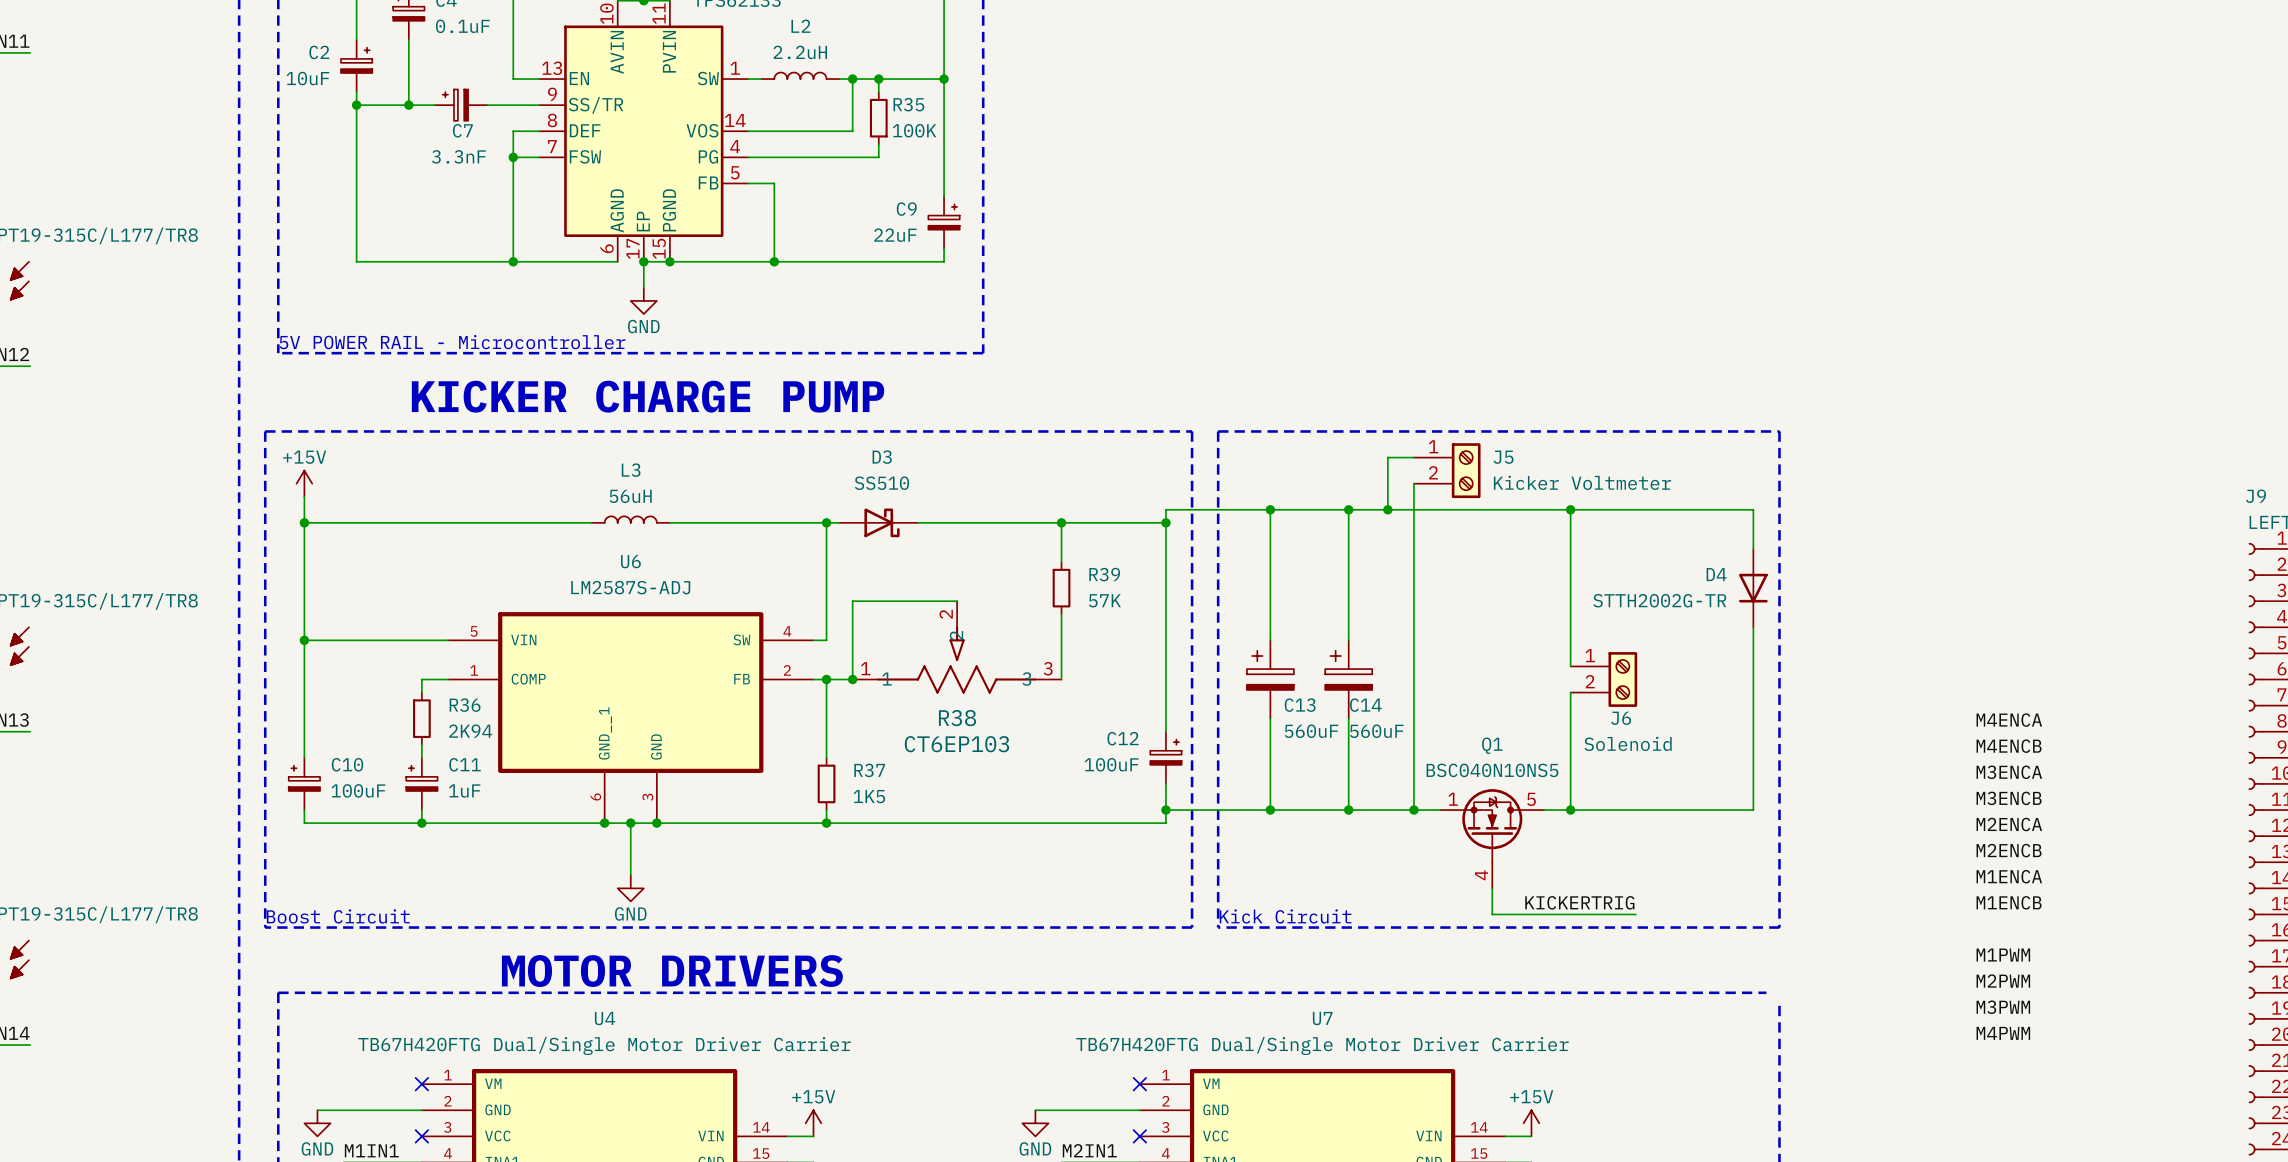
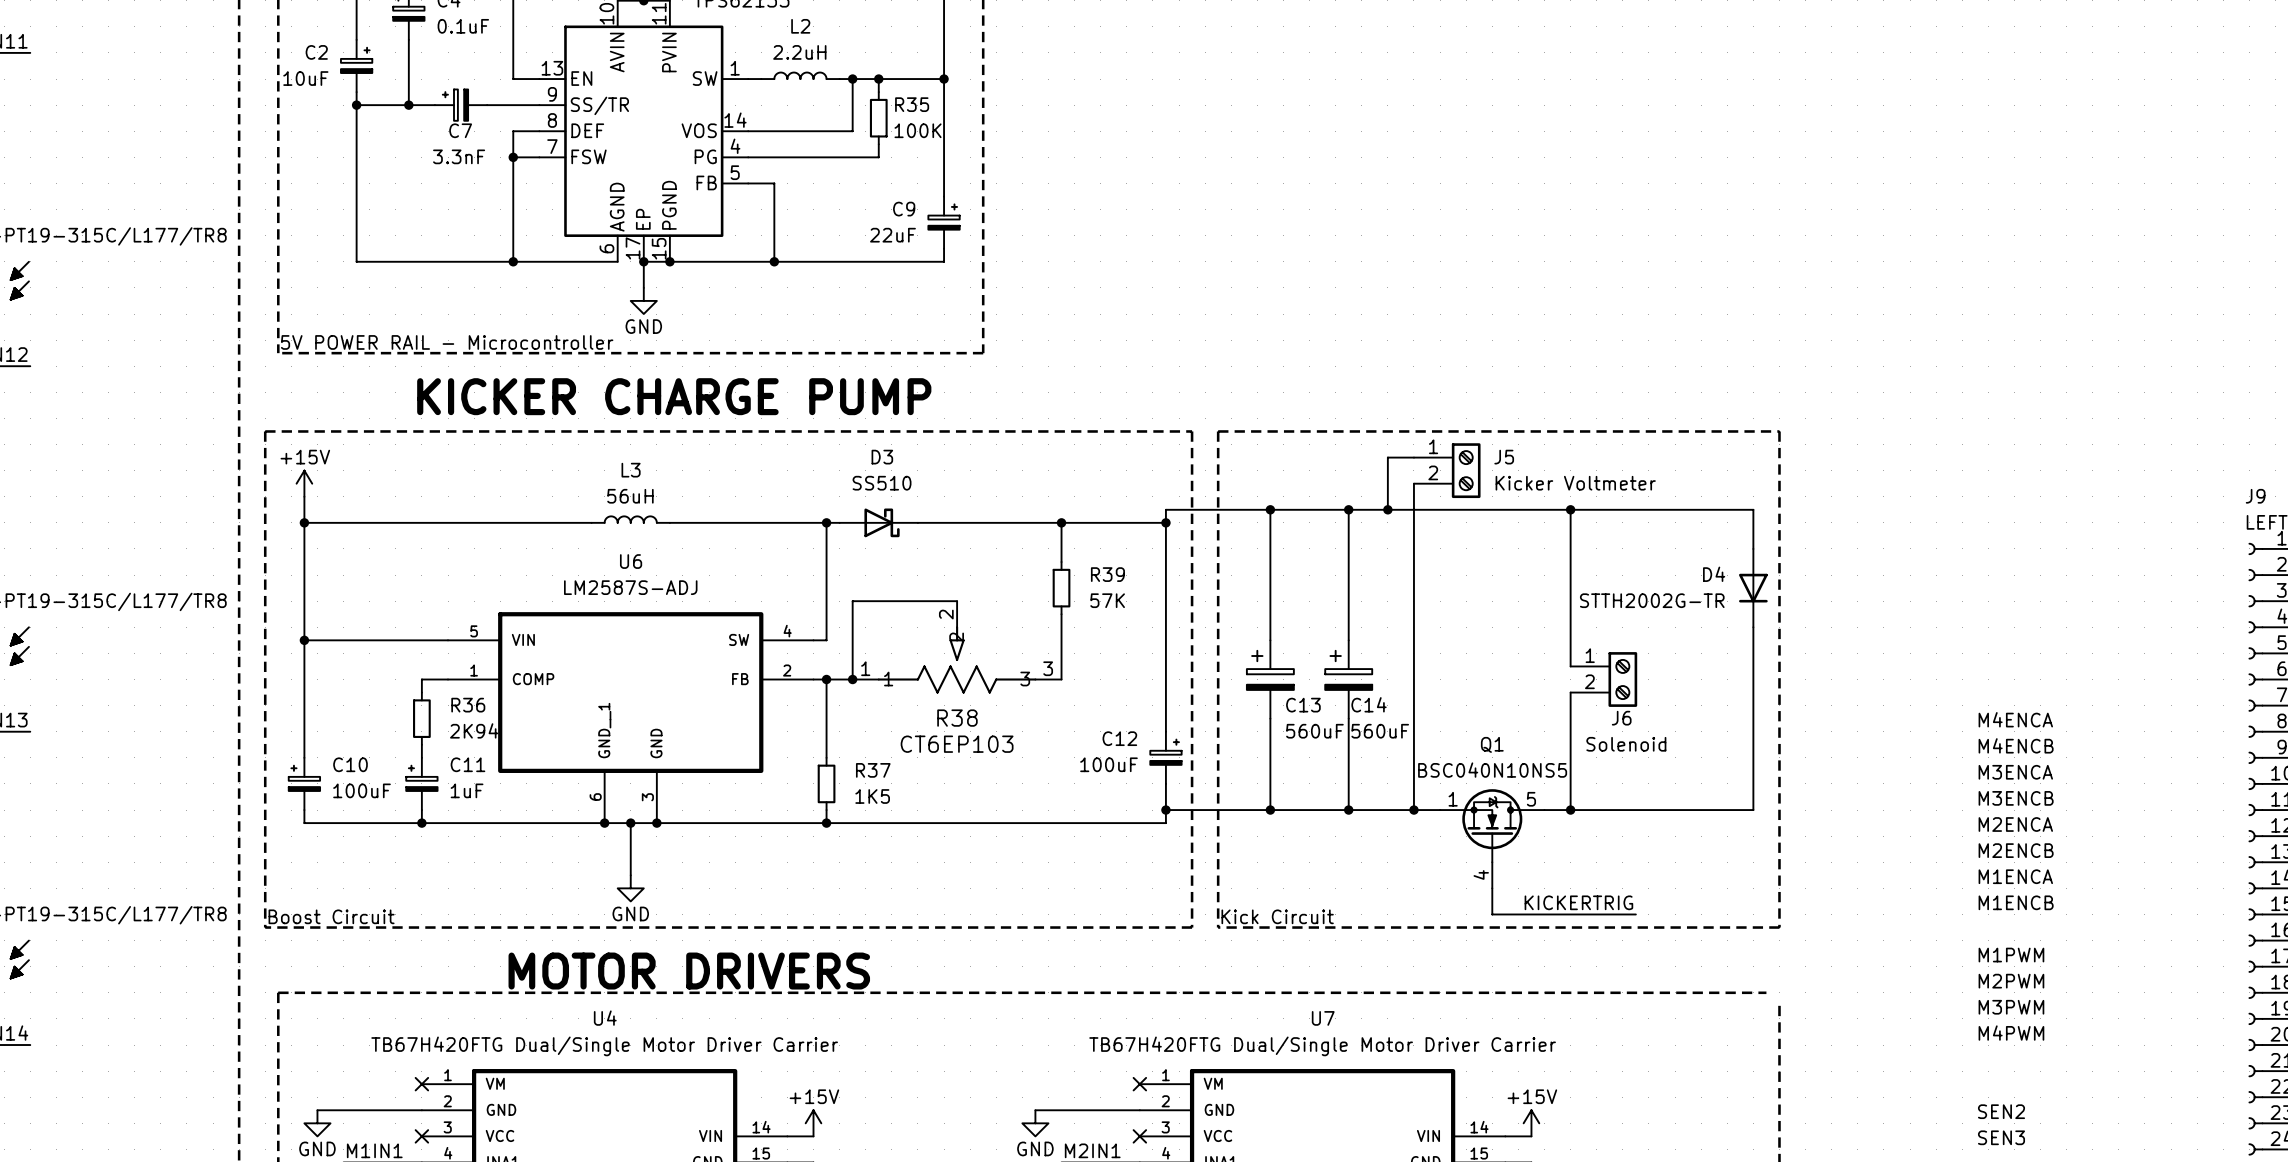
label: none -> SEN2 (2001, 1111)
label: none -> SEN3 (2001, 1137)

